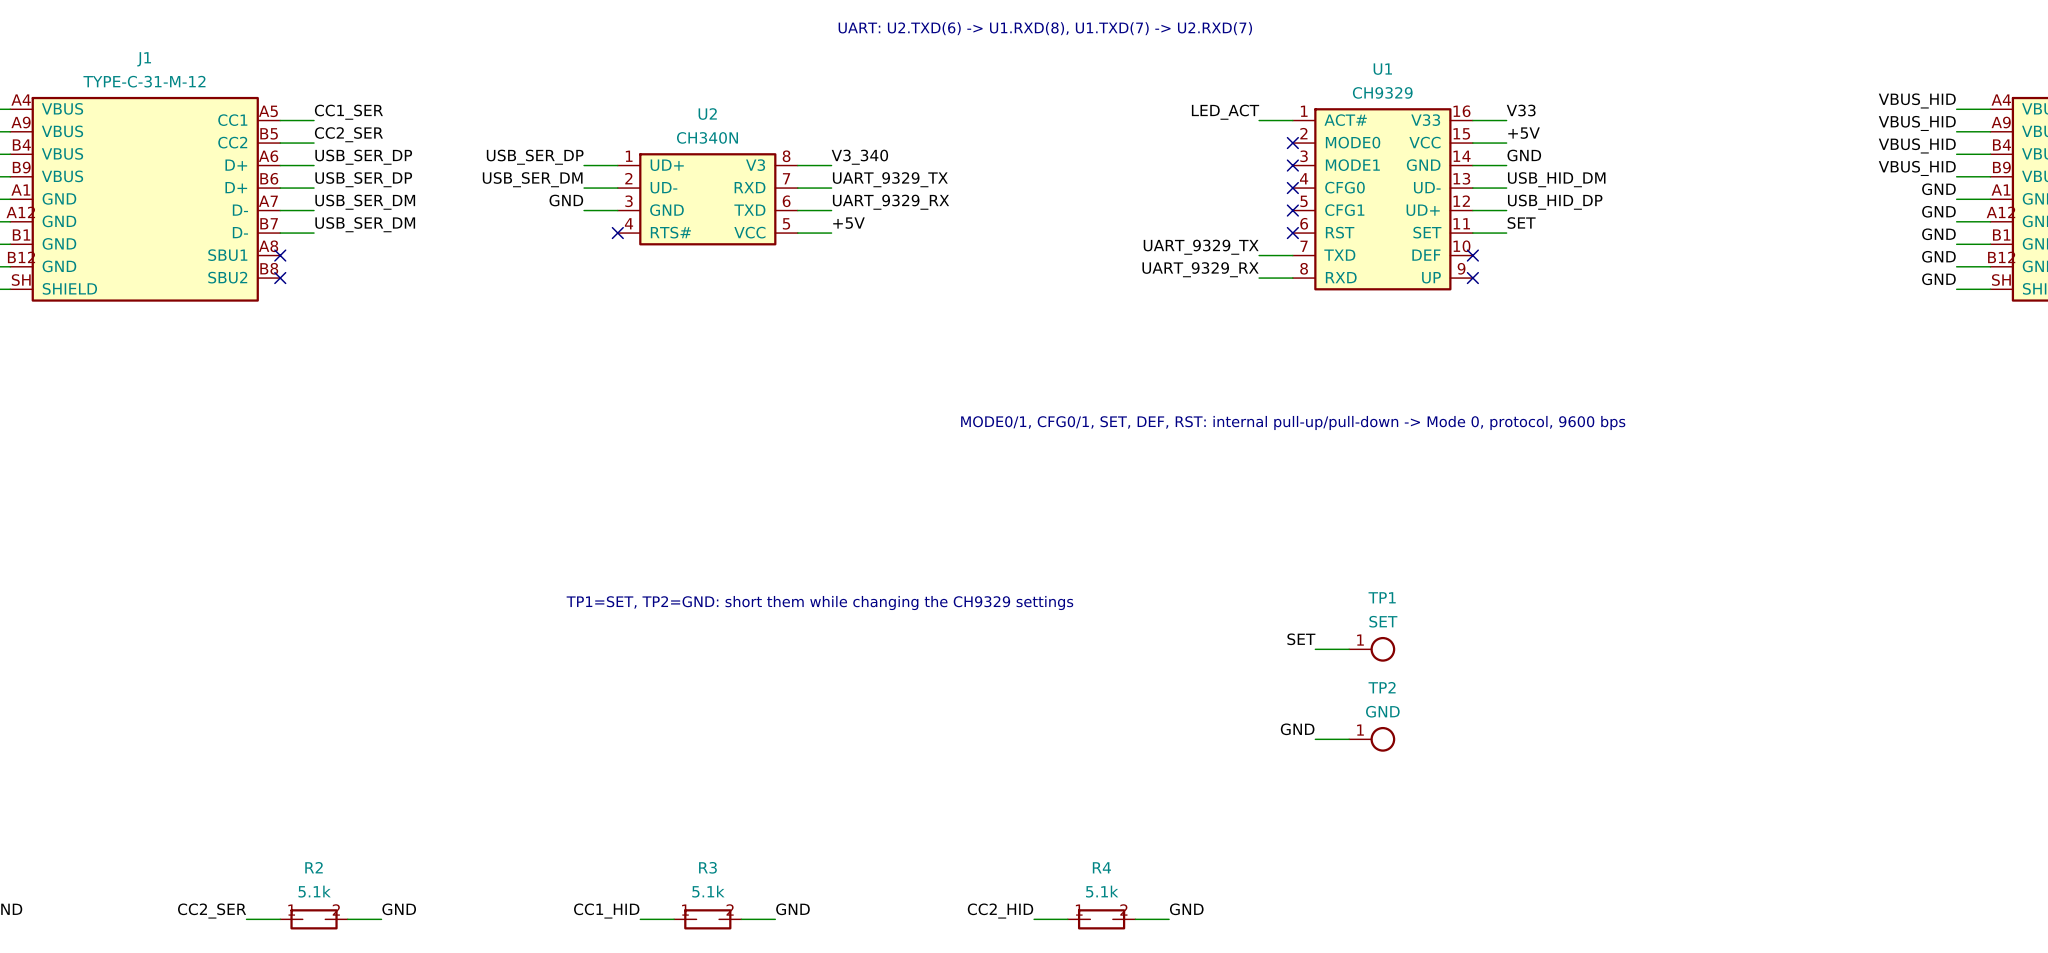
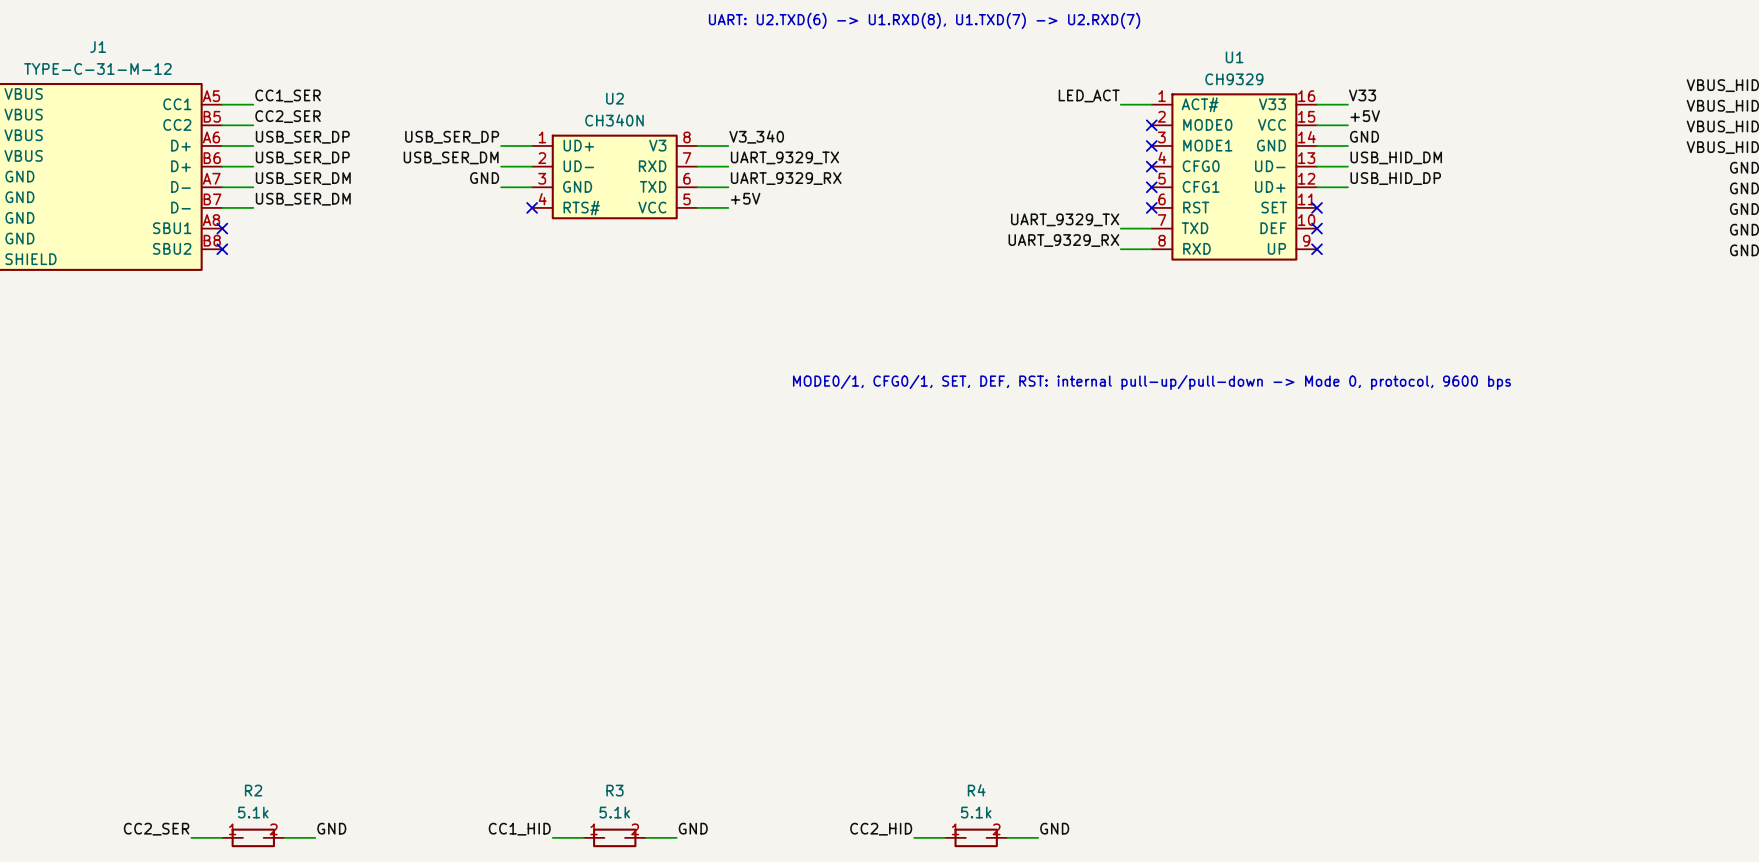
label: SET (1521, 223) -> none
wire: (1472, 233) (1506, 233) -> none
no-connect mark: none -> (1316, 207)
text: TP1=SET, TP2=GND: short them while changing the CH9329 settings (819, 603) -> none
label: SET (1301, 639) -> none
wire: (1315, 649) (1349, 649) -> none
TP1: SET (1372, 649) -> none
label: GND (1297, 729) -> none
wire: (1315, 739) (1349, 739) -> none
TP2: GND (1372, 739) -> none

